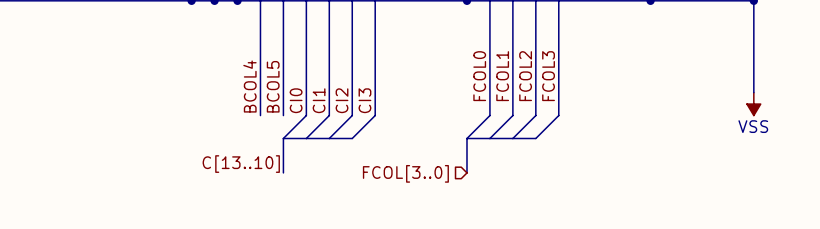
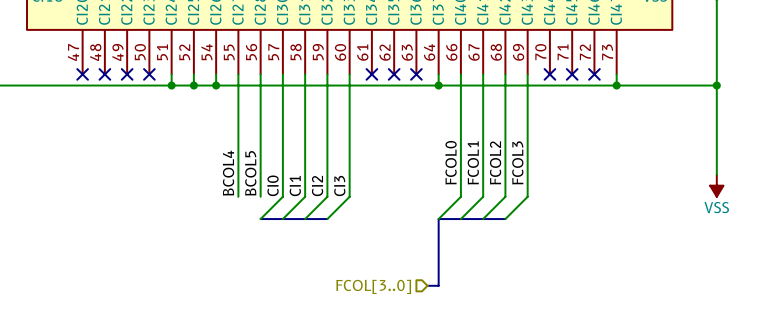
bus: (283, 138) (283, 172) -> none
label: C[13..10] (241, 164) -> none
bus: none -> (438, 252) (438, 285) (427, 285)
hierarchical label position: FCOL[3..0] (405, 173) -> FCOL[3..0] (373, 286)

